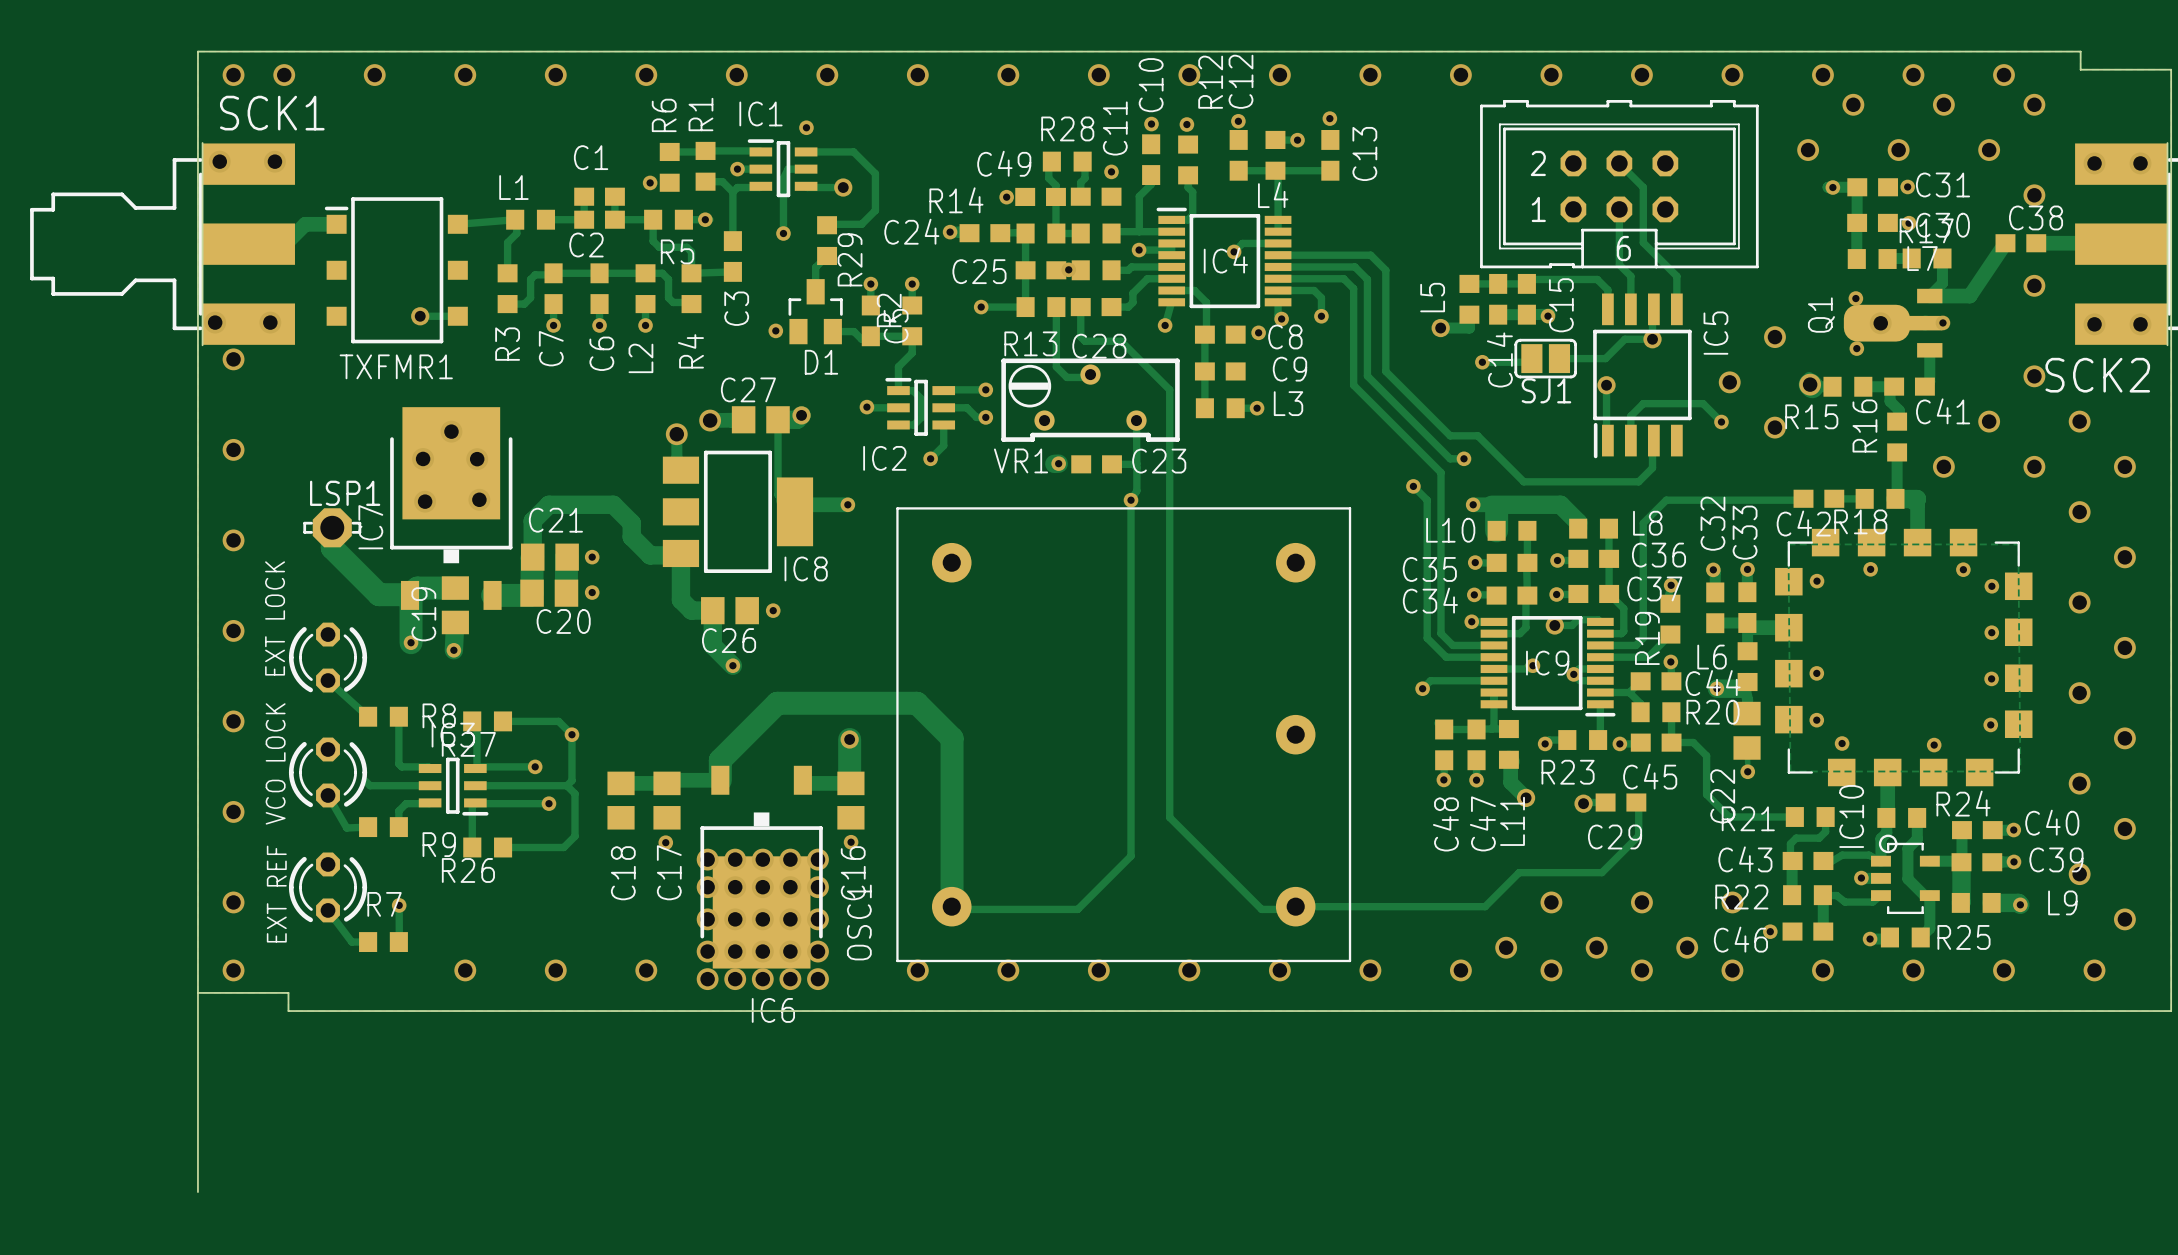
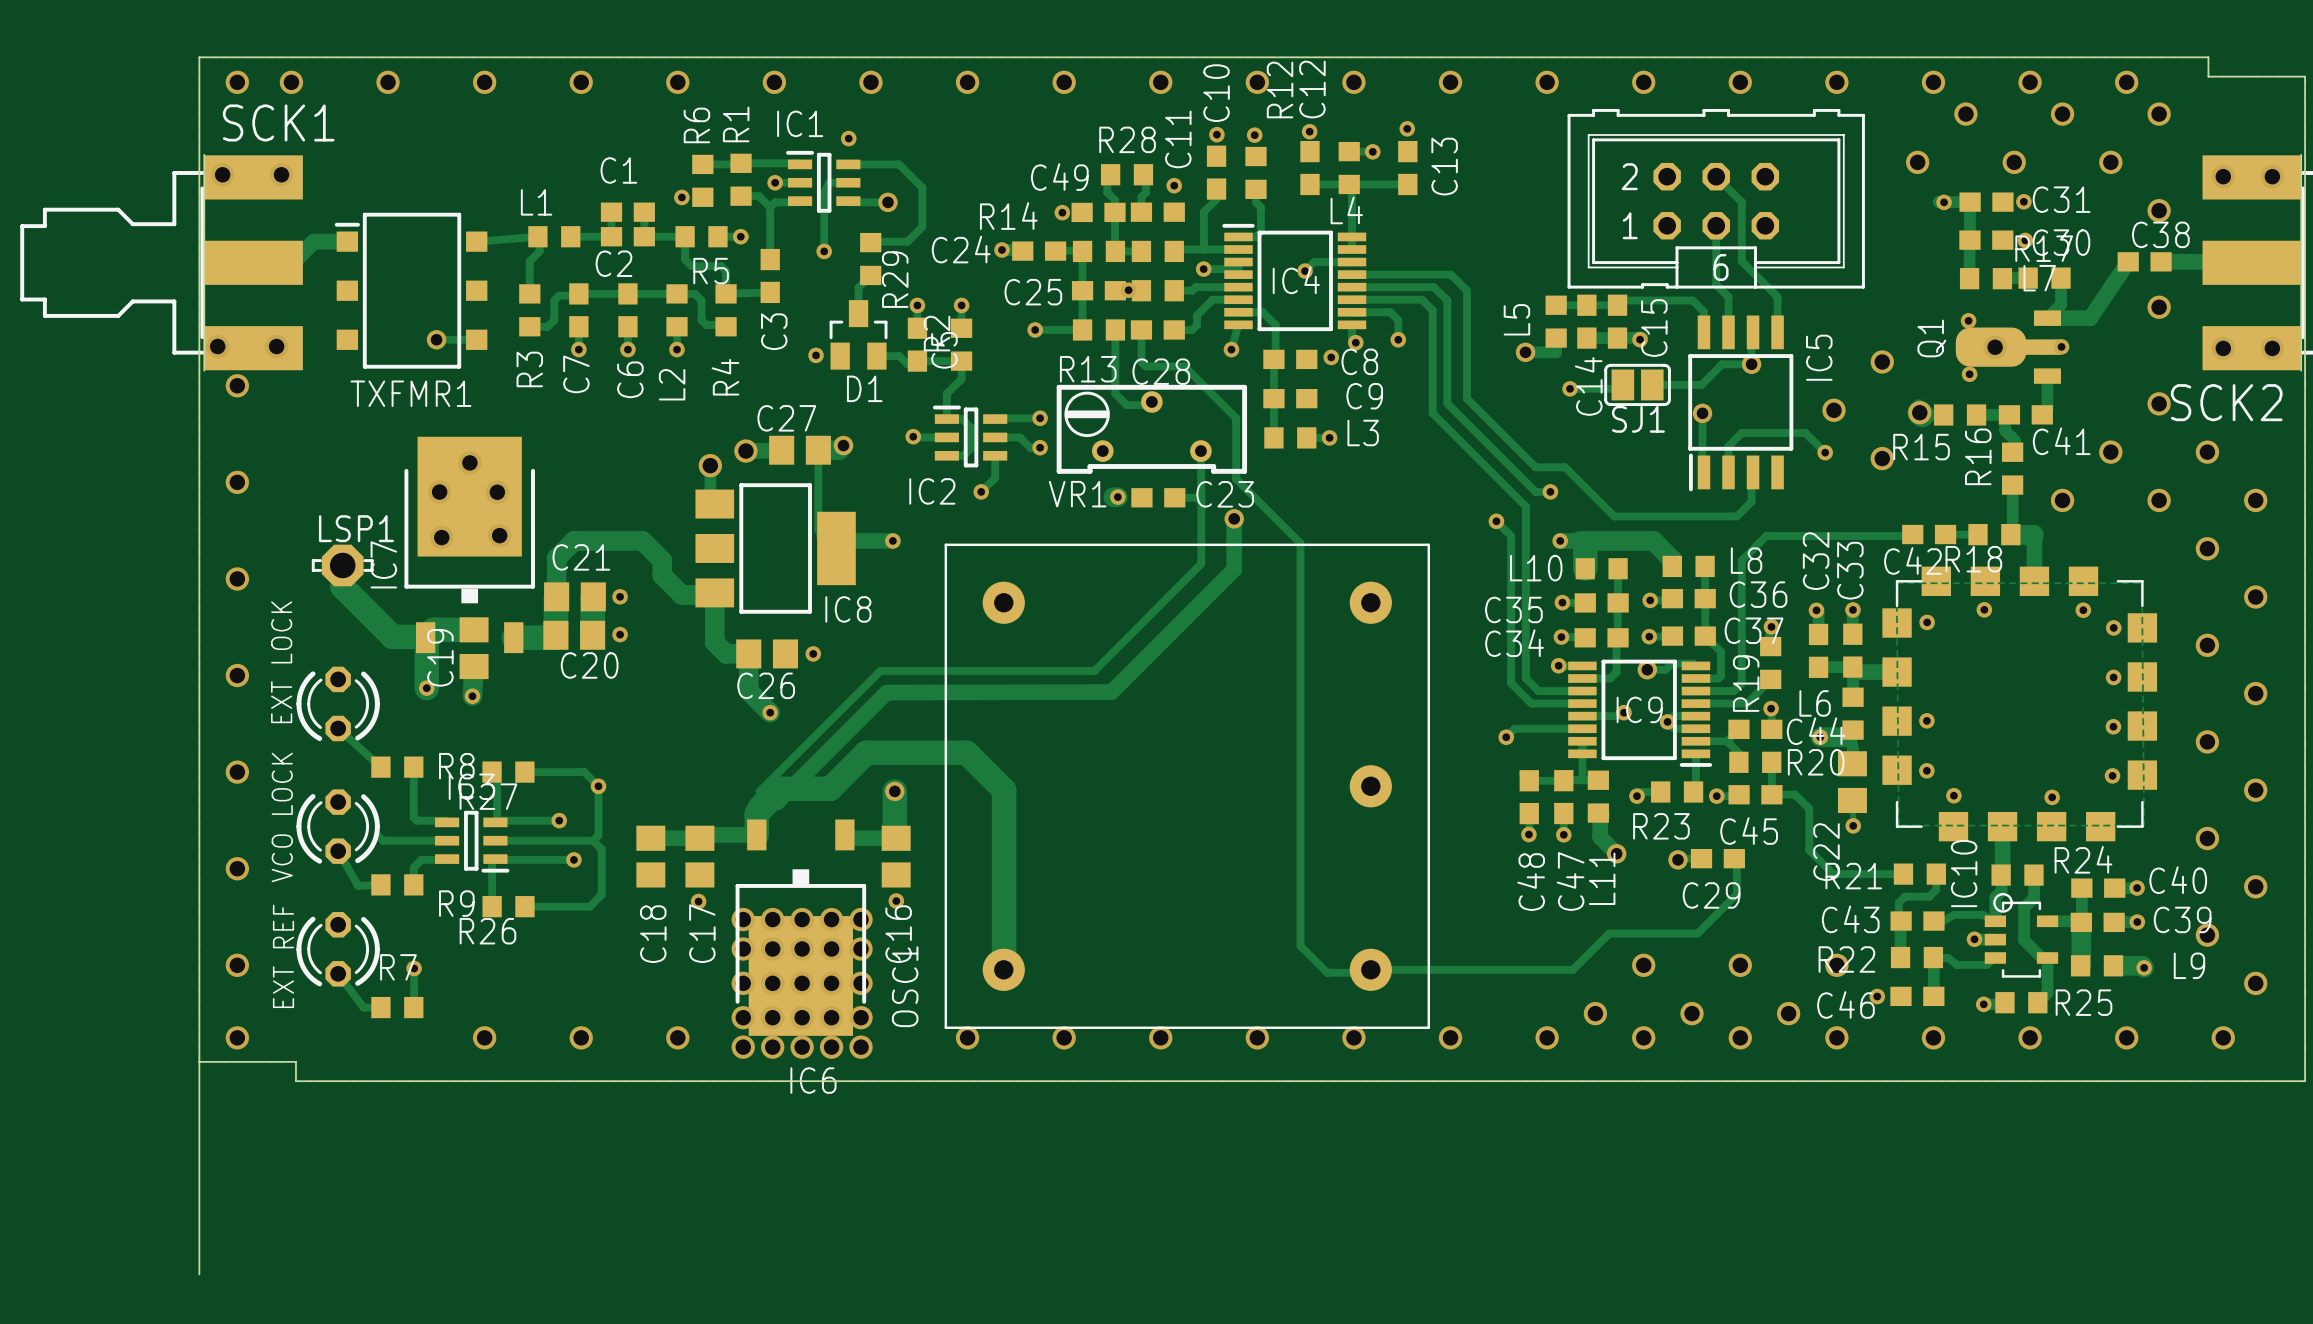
track: (1169, 389) (1169, 817) (1261, 909) -> (1236, 418) (1236, 479) (1300, 543) (1300, 945) (1327, 972) (1334, 972)
track: none -> (1234, 518) (1234, 569) (1111, 692) (886, 692) (777, 801) (768, 801)
via: none -> (1234, 518)
track: (1136, 490) (1131, 500) (1131, 856) (1077, 909) (954, 909) -> (1201, 526) (1201, 563) (1094, 670) (880, 670) (759, 791) (759, 810)
via: (1131, 500) -> none
track: (822, 703) (777, 703) (731, 748) -> (866, 752) (830, 788) (778, 788) (759, 807)

